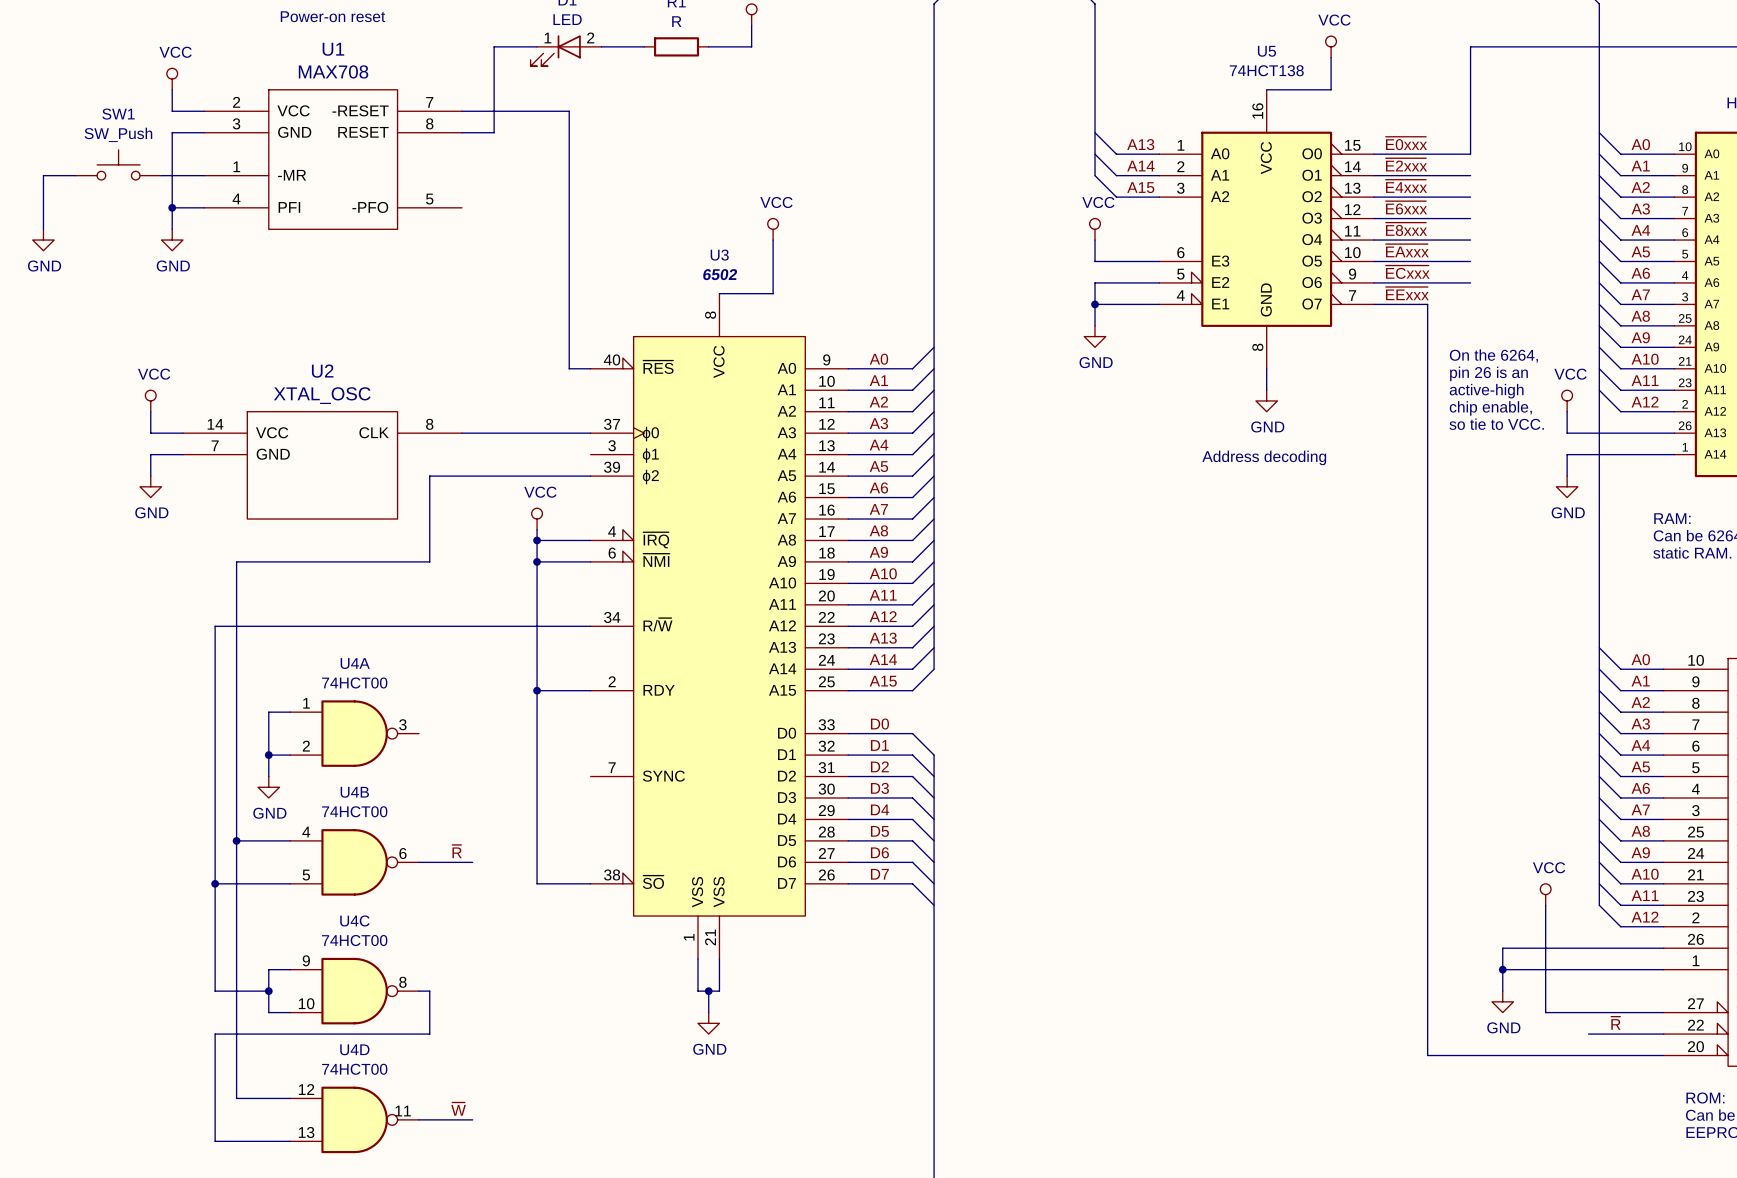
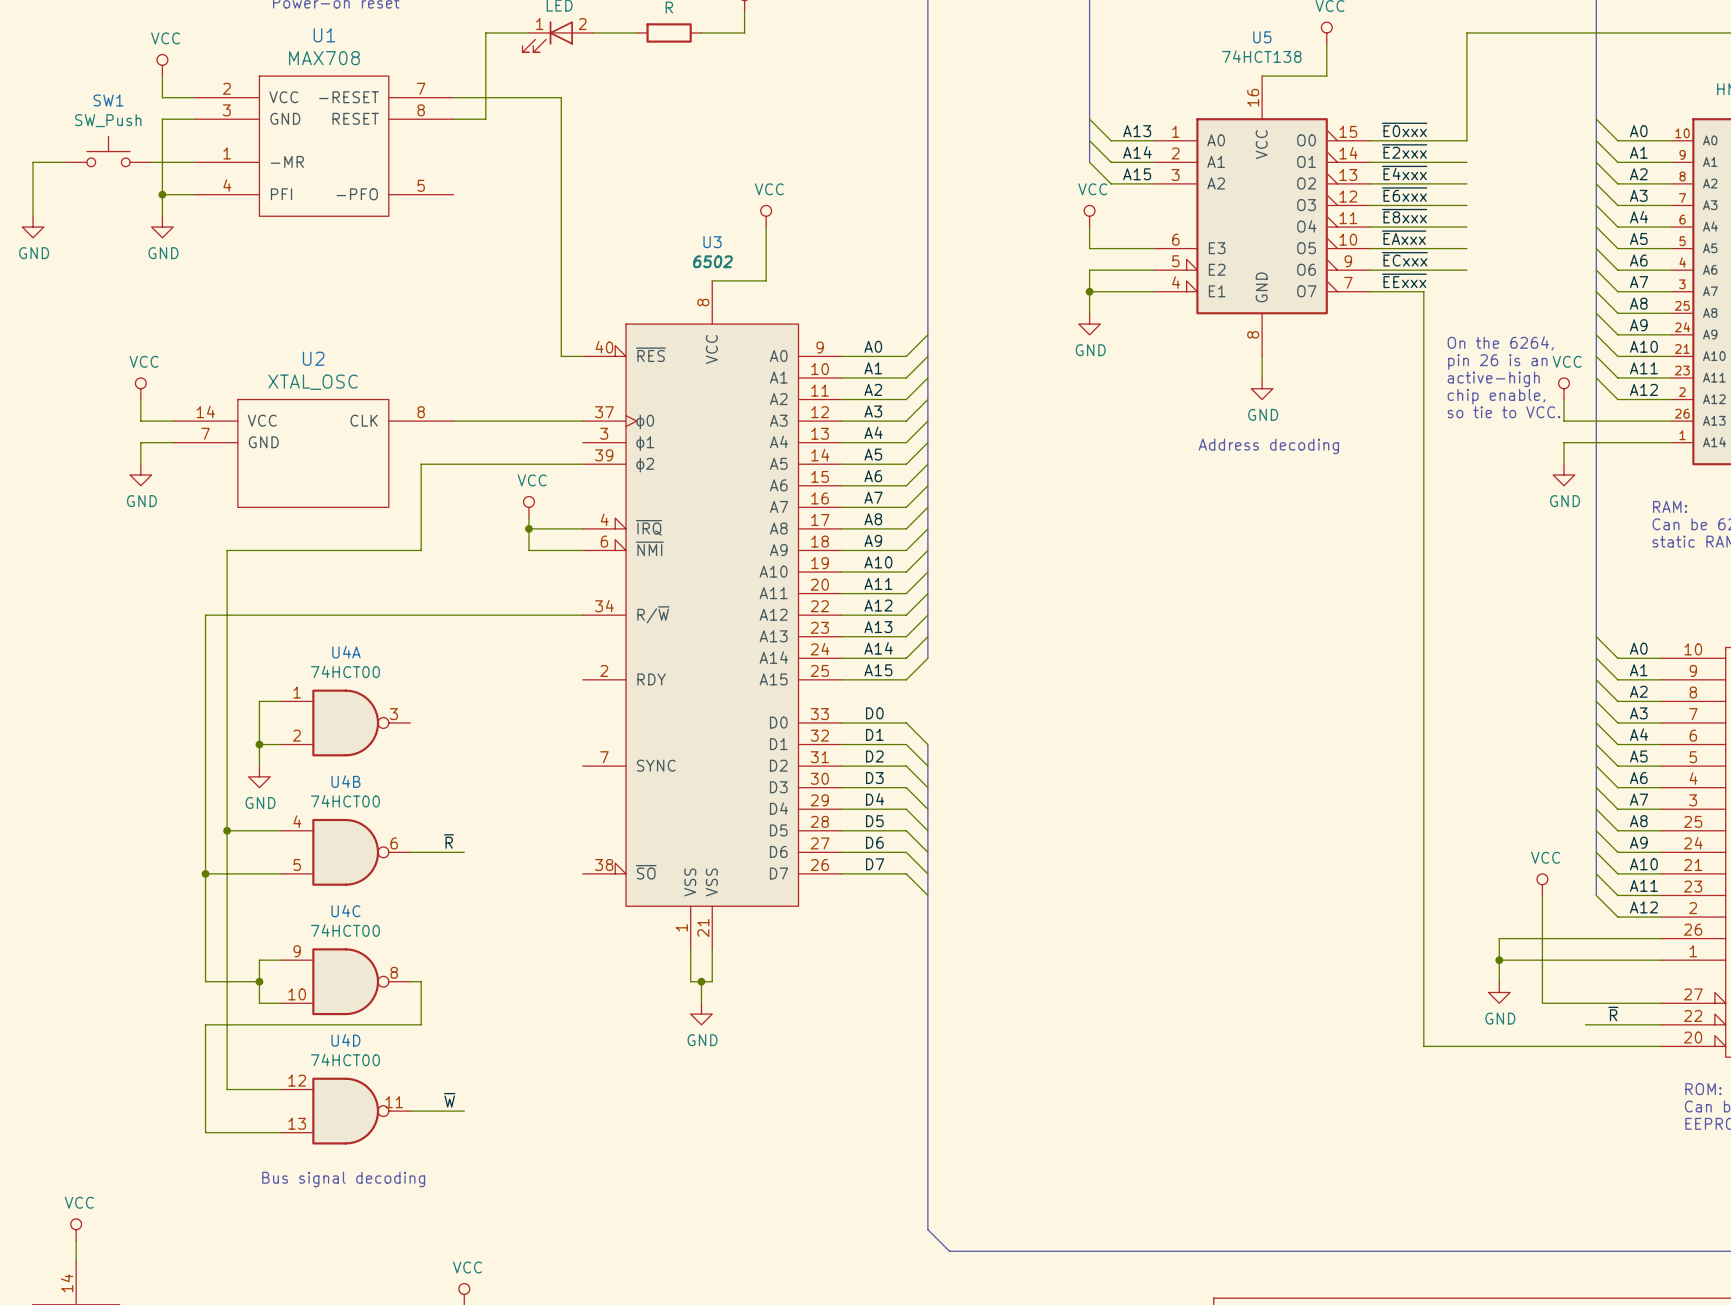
wire: (537, 561) (537, 883) (590, 883) -> none
junction: (537, 561) -> none
wire: (537, 690) (590, 690) -> none
junction: (537, 690) -> none

